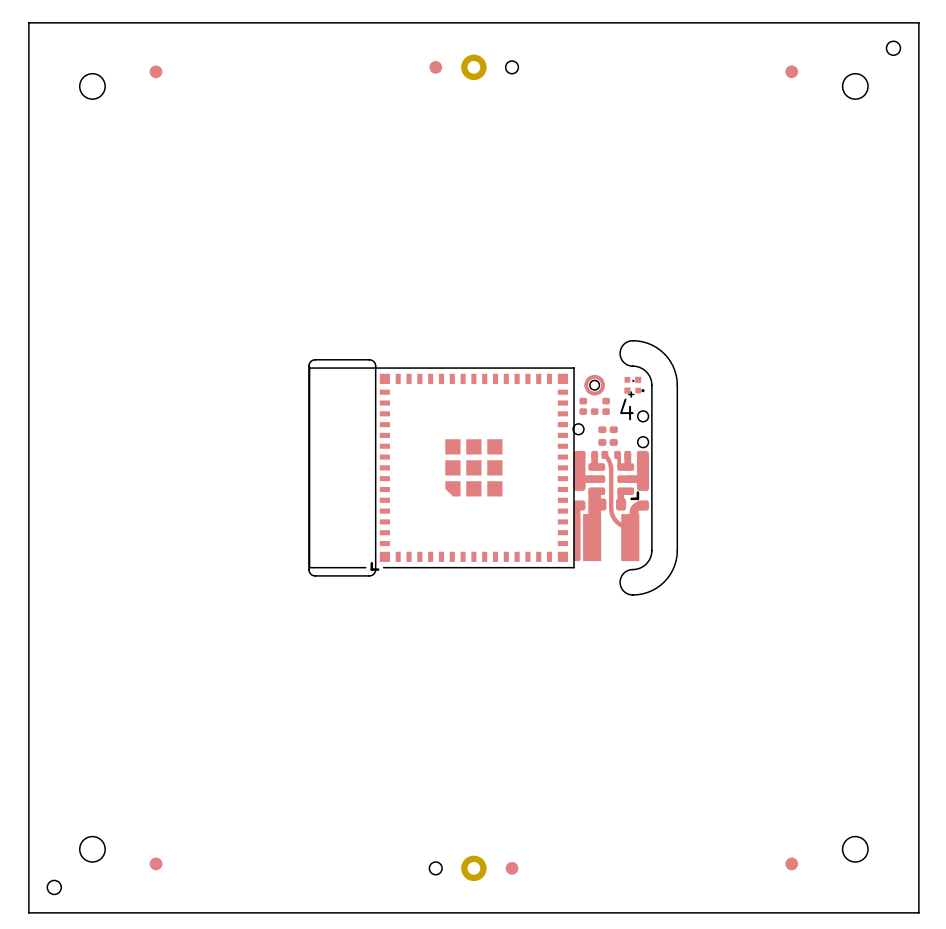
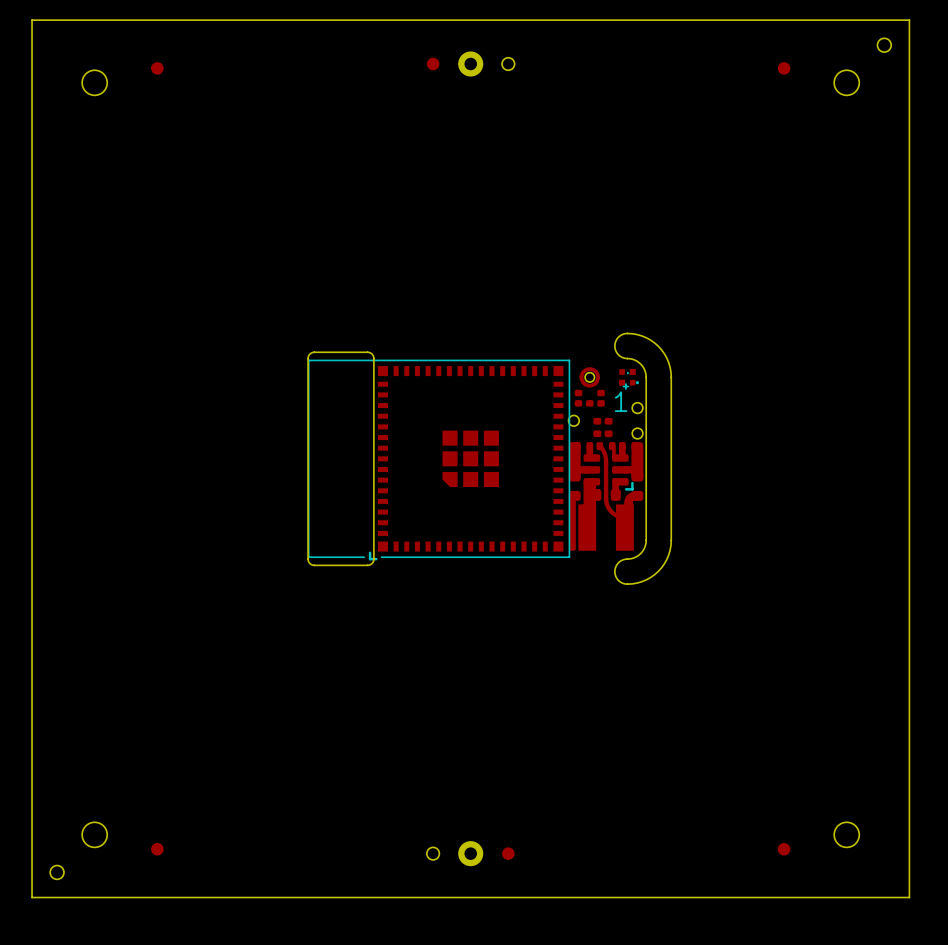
text: 4 (626, 409) -> 1 (621, 401)

